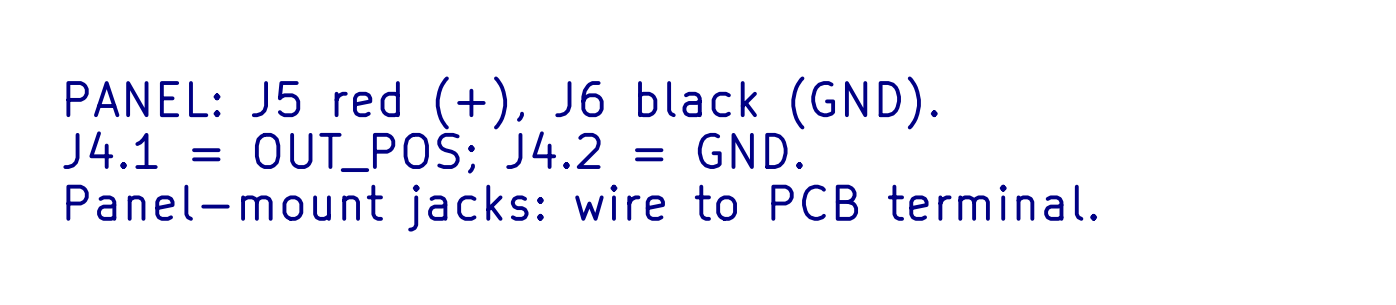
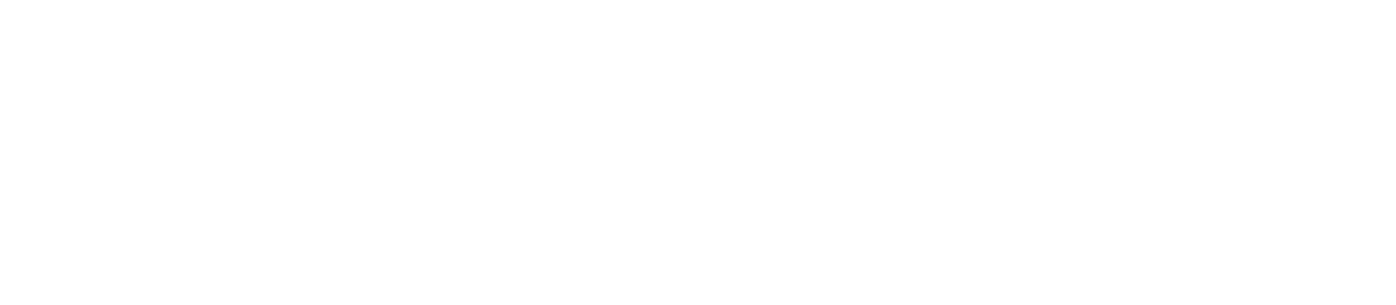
text: PANEL: J5 red (+), J6 black (GND). (502, 102) -> none
text: J4.1 = OUT_POS; J4.2 = GND. (433, 152) -> none
text: Panel-mount jacks: wire to PCB terminal. (581, 208) -> none

